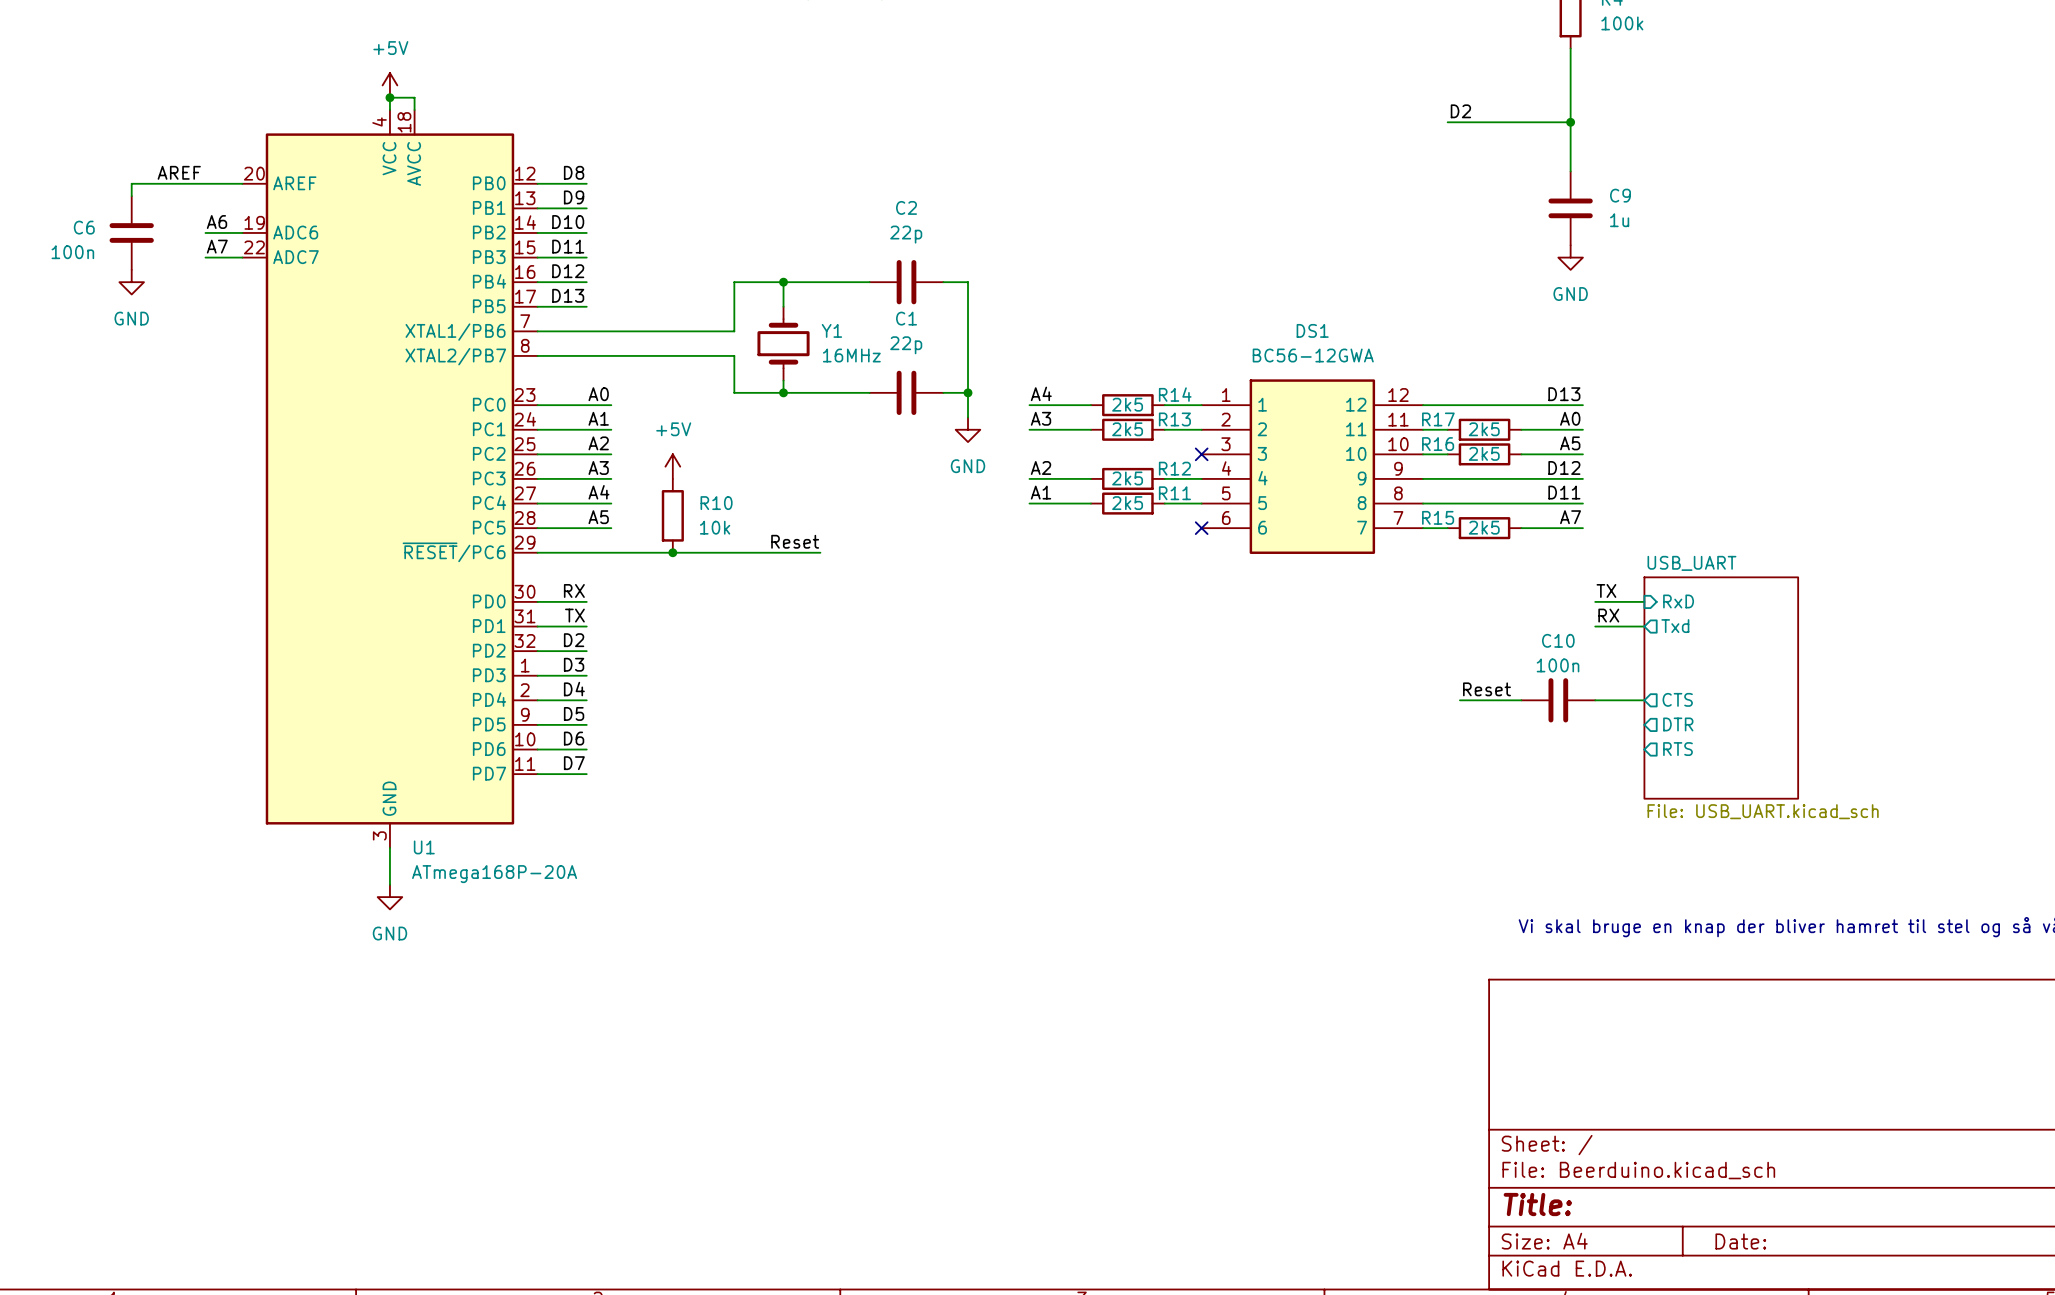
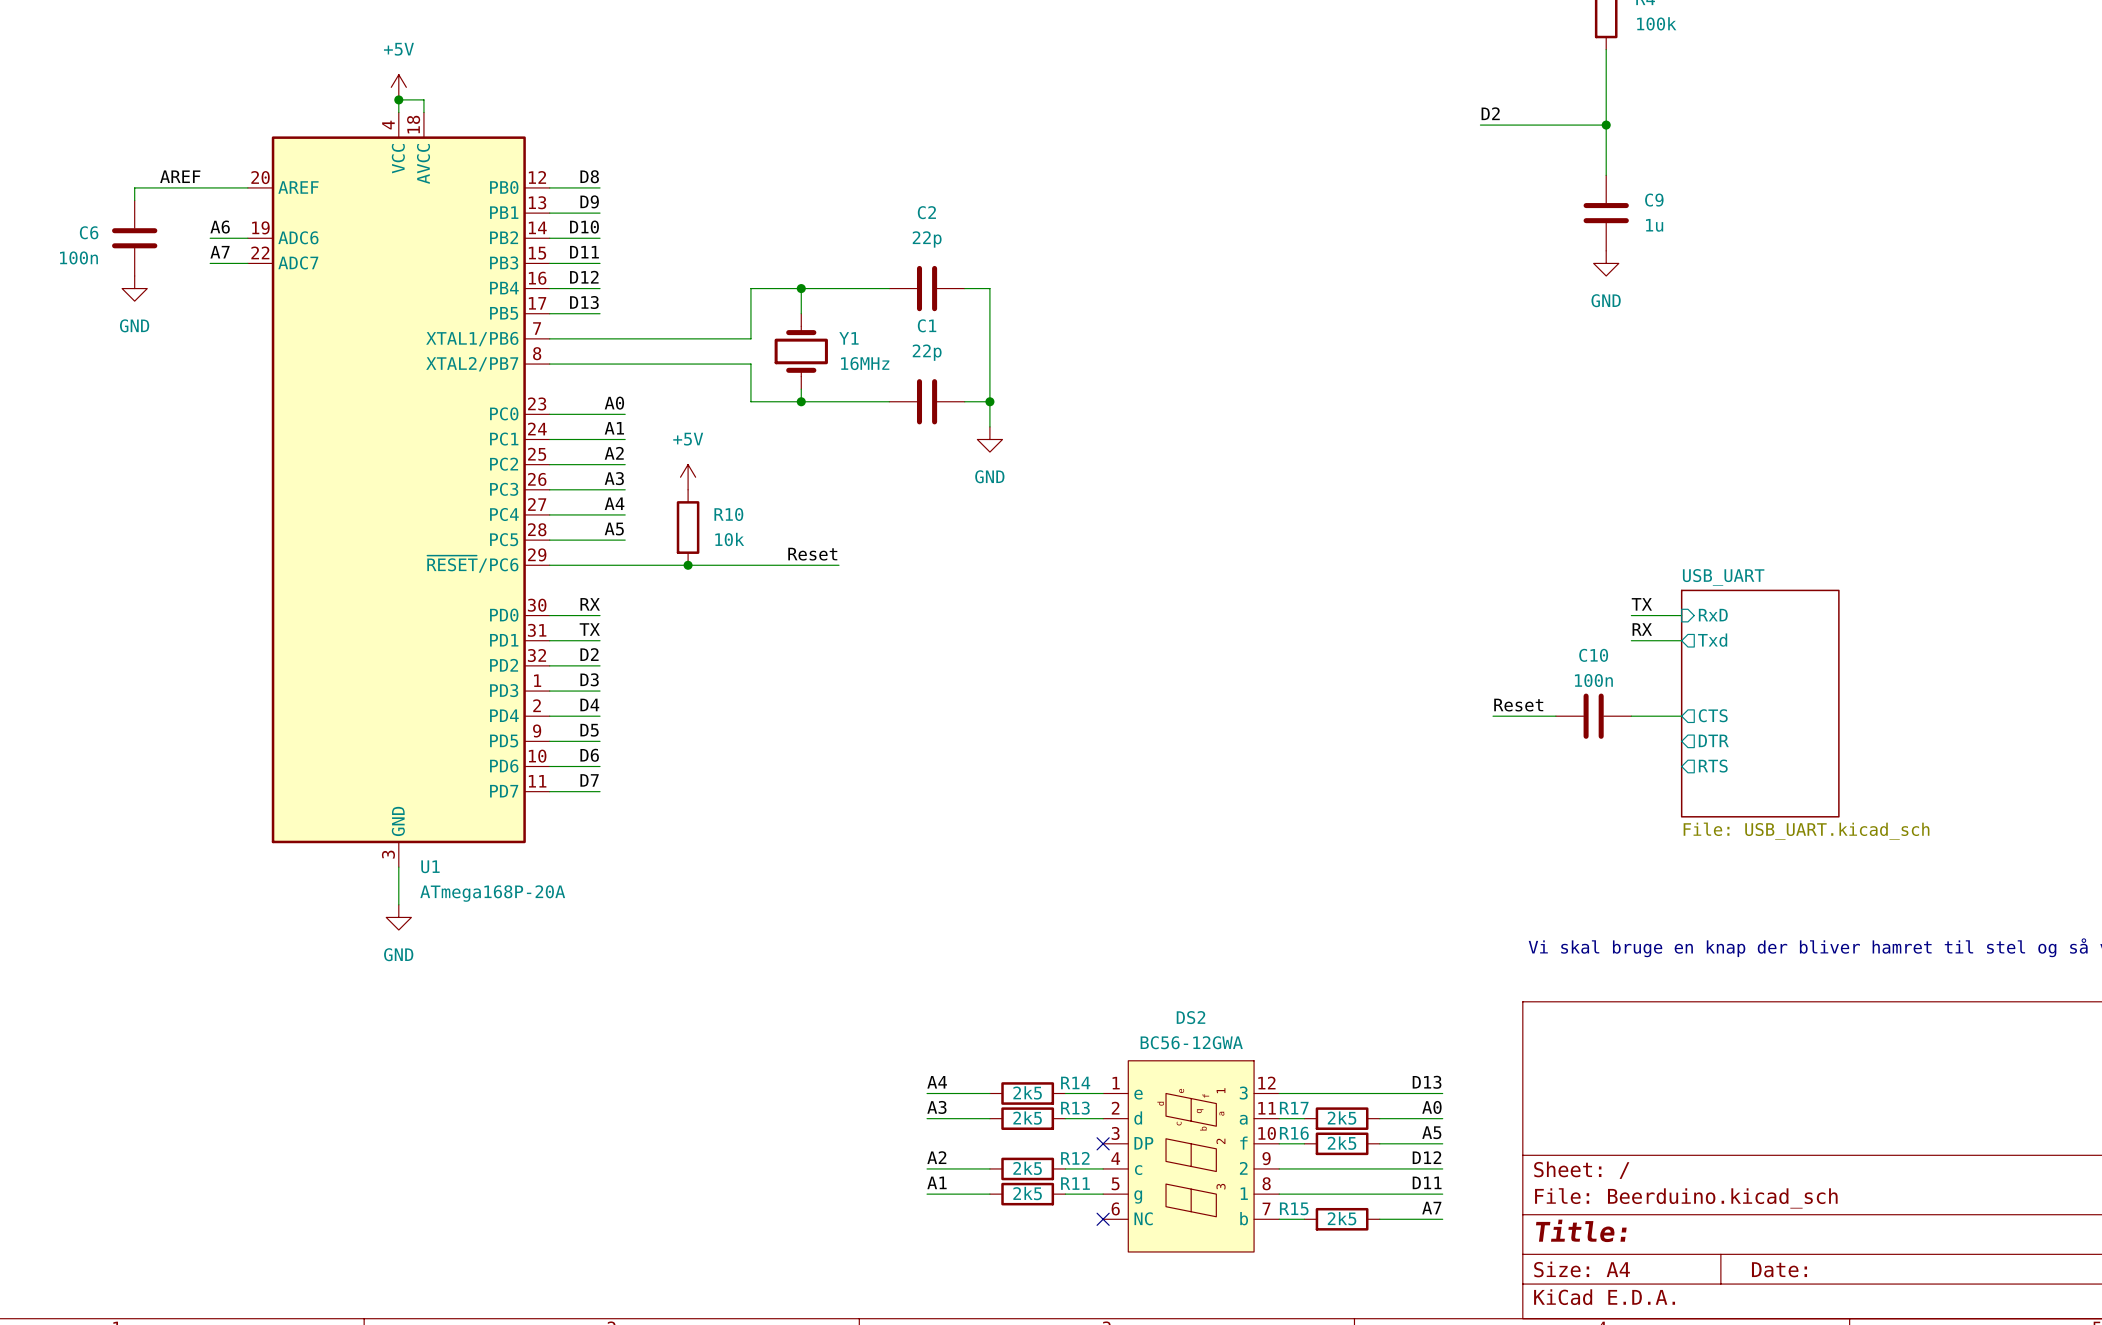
label: A4 (1041, 393) -> none
label: D13 (1564, 394) -> none
wire: (1029, 405) (1090, 405) -> none
R14 position: (1127, 405) -> (1027, 1093)
wire: (1164, 405) (1201, 405) -> none
wire: (1423, 405) (1582, 405) -> none
label: A3 (1041, 418) -> none
label: A0 (1570, 418) -> none
wire: (1029, 429) (1090, 429) -> none
R13 position: (1127, 429) -> (1027, 1118)
wire: (1164, 429) (1201, 429) -> none
wire: (1423, 429) (1447, 429) -> none
R17 position: (1484, 429) -> (1342, 1118)
wire: (1521, 429) (1582, 429) -> none
label: A5 (1570, 443) -> none
no-connect mark: (1201, 454) -> none
wire: (1423, 454) (1447, 454) -> none
R16 position: (1484, 454) -> (1342, 1143)
wire: (1521, 454) (1582, 454) -> none
DS1: BC56-12GWA (1312, 466) -> none
label: A2 (1041, 467) -> none
label: D12 (1564, 467) -> none
wire: (1029, 478) (1090, 478) -> none
R12 position: (1127, 478) -> (1027, 1168)
wire: (1164, 478) (1201, 478) -> none
wire: (1423, 478) (1582, 478) -> none
label: A1 (1041, 492) -> none
label: D11 (1564, 492) -> none
wire: (1029, 503) (1090, 503) -> none
R11 position: (1127, 503) -> (1027, 1194)
wire: (1164, 503) (1201, 503) -> none
wire: (1423, 503) (1582, 503) -> none
label: A7 (1570, 517) -> none
no-connect mark: (1201, 528) -> none
wire: (1423, 528) (1447, 528) -> none
R15 position: (1484, 528) -> (1342, 1219)
wire: (1521, 528) (1582, 528) -> none
label: none -> A4 (937, 1082)
label: none -> D13 (1427, 1082)
wire: none -> (927, 1093) (989, 1093)
wire: none -> (1065, 1093) (1103, 1093)
wire: none -> (1279, 1093) (1442, 1093)
label: none -> A3 (936, 1107)
label: none -> A0 (1431, 1107)
wire: none -> (927, 1118) (989, 1118)
wire: none -> (1065, 1118) (1103, 1118)
wire: none -> (1279, 1118) (1304, 1118)
wire: none -> (1379, 1118) (1442, 1118)
label: none -> A5 (1431, 1132)
no-connect mark: none -> (1103, 1143)
wire: none -> (1279, 1143) (1304, 1143)
wire: none -> (1379, 1143) (1442, 1143)
DS2: none -> BC56-12GWA (1191, 1156)
label: none -> A2 (936, 1157)
label: none -> D12 (1426, 1157)
wire: none -> (927, 1168) (989, 1168)
wire: none -> (1065, 1168) (1103, 1168)
wire: none -> (1279, 1168) (1442, 1168)
label: none -> A1 (937, 1182)
label: none -> D11 (1427, 1182)
wire: none -> (927, 1194) (989, 1194)
wire: none -> (1065, 1194) (1103, 1194)
wire: none -> (1279, 1194) (1442, 1194)
label: none -> A7 (1431, 1208)
no-connect mark: none -> (1103, 1219)
wire: none -> (1279, 1219) (1304, 1219)
wire: none -> (1379, 1219) (1442, 1219)

